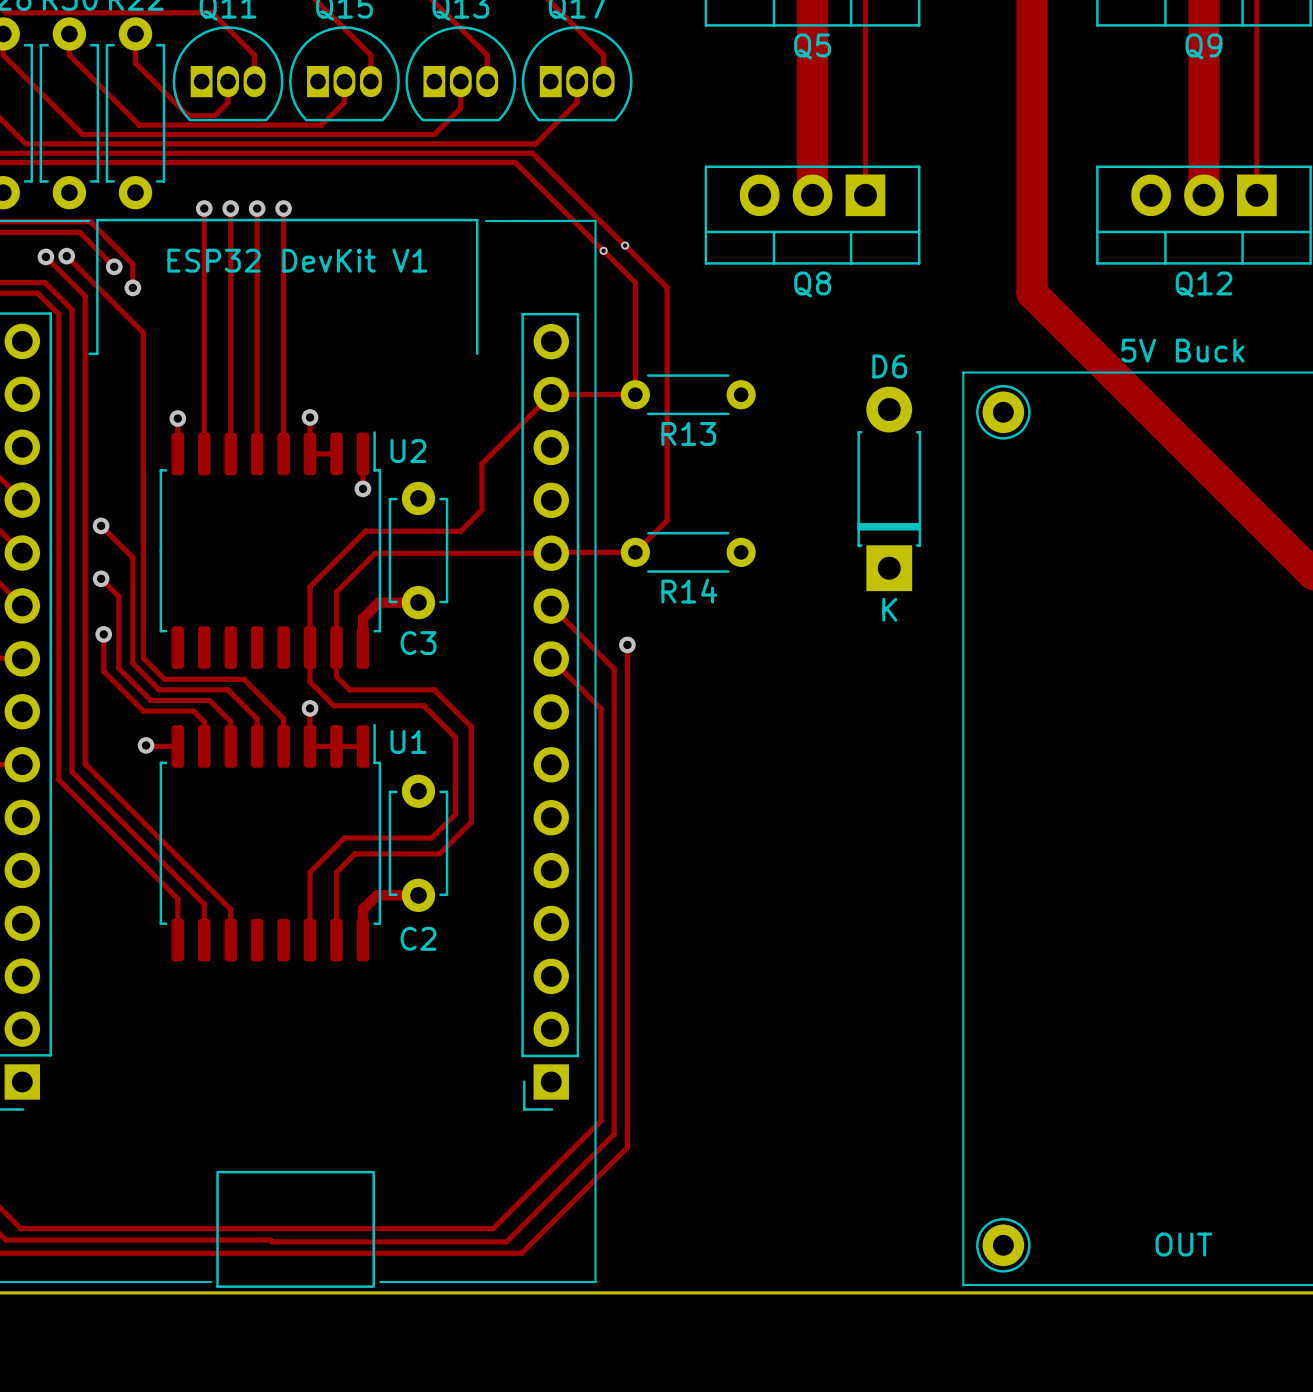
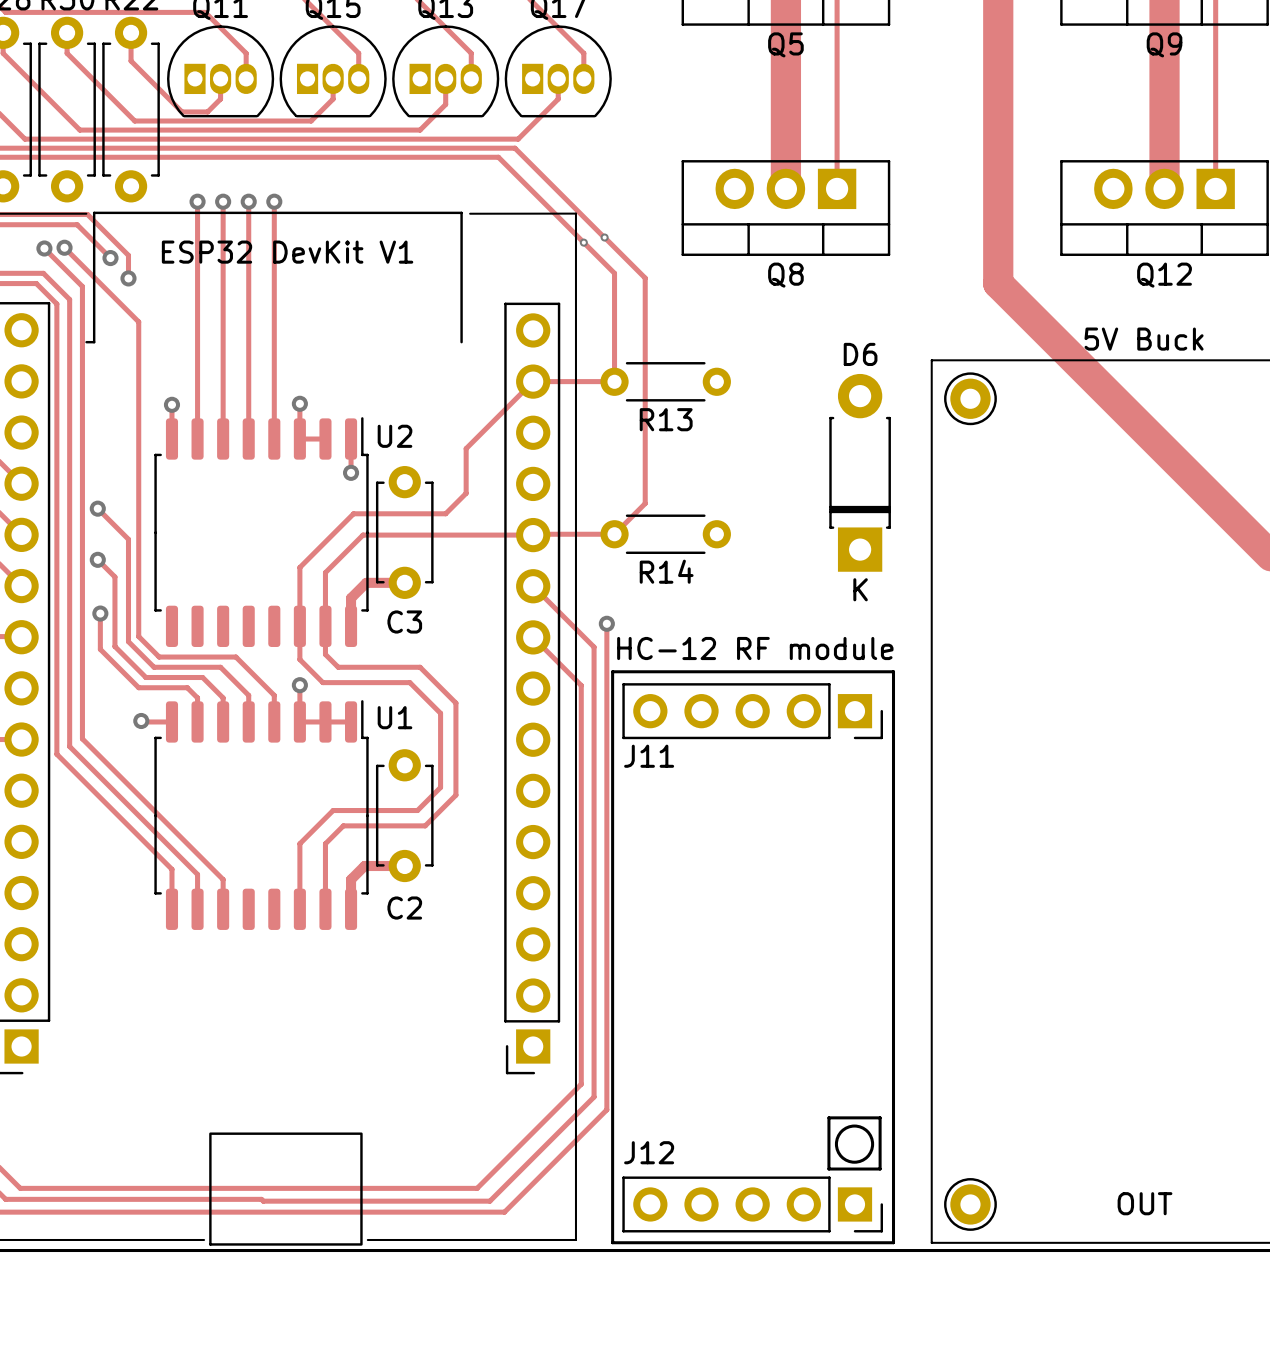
line: none -> (612, 671) (893, 671) (893, 1242) (612, 1242) (612, 671)
J11: none -> (752, 711)
line: none -> (828, 1117) (828, 1169) (880, 1169) (880, 1117) (828, 1117)
drawing: none -> [834, 1124, 875, 1164]
J12: none -> (752, 1204)

